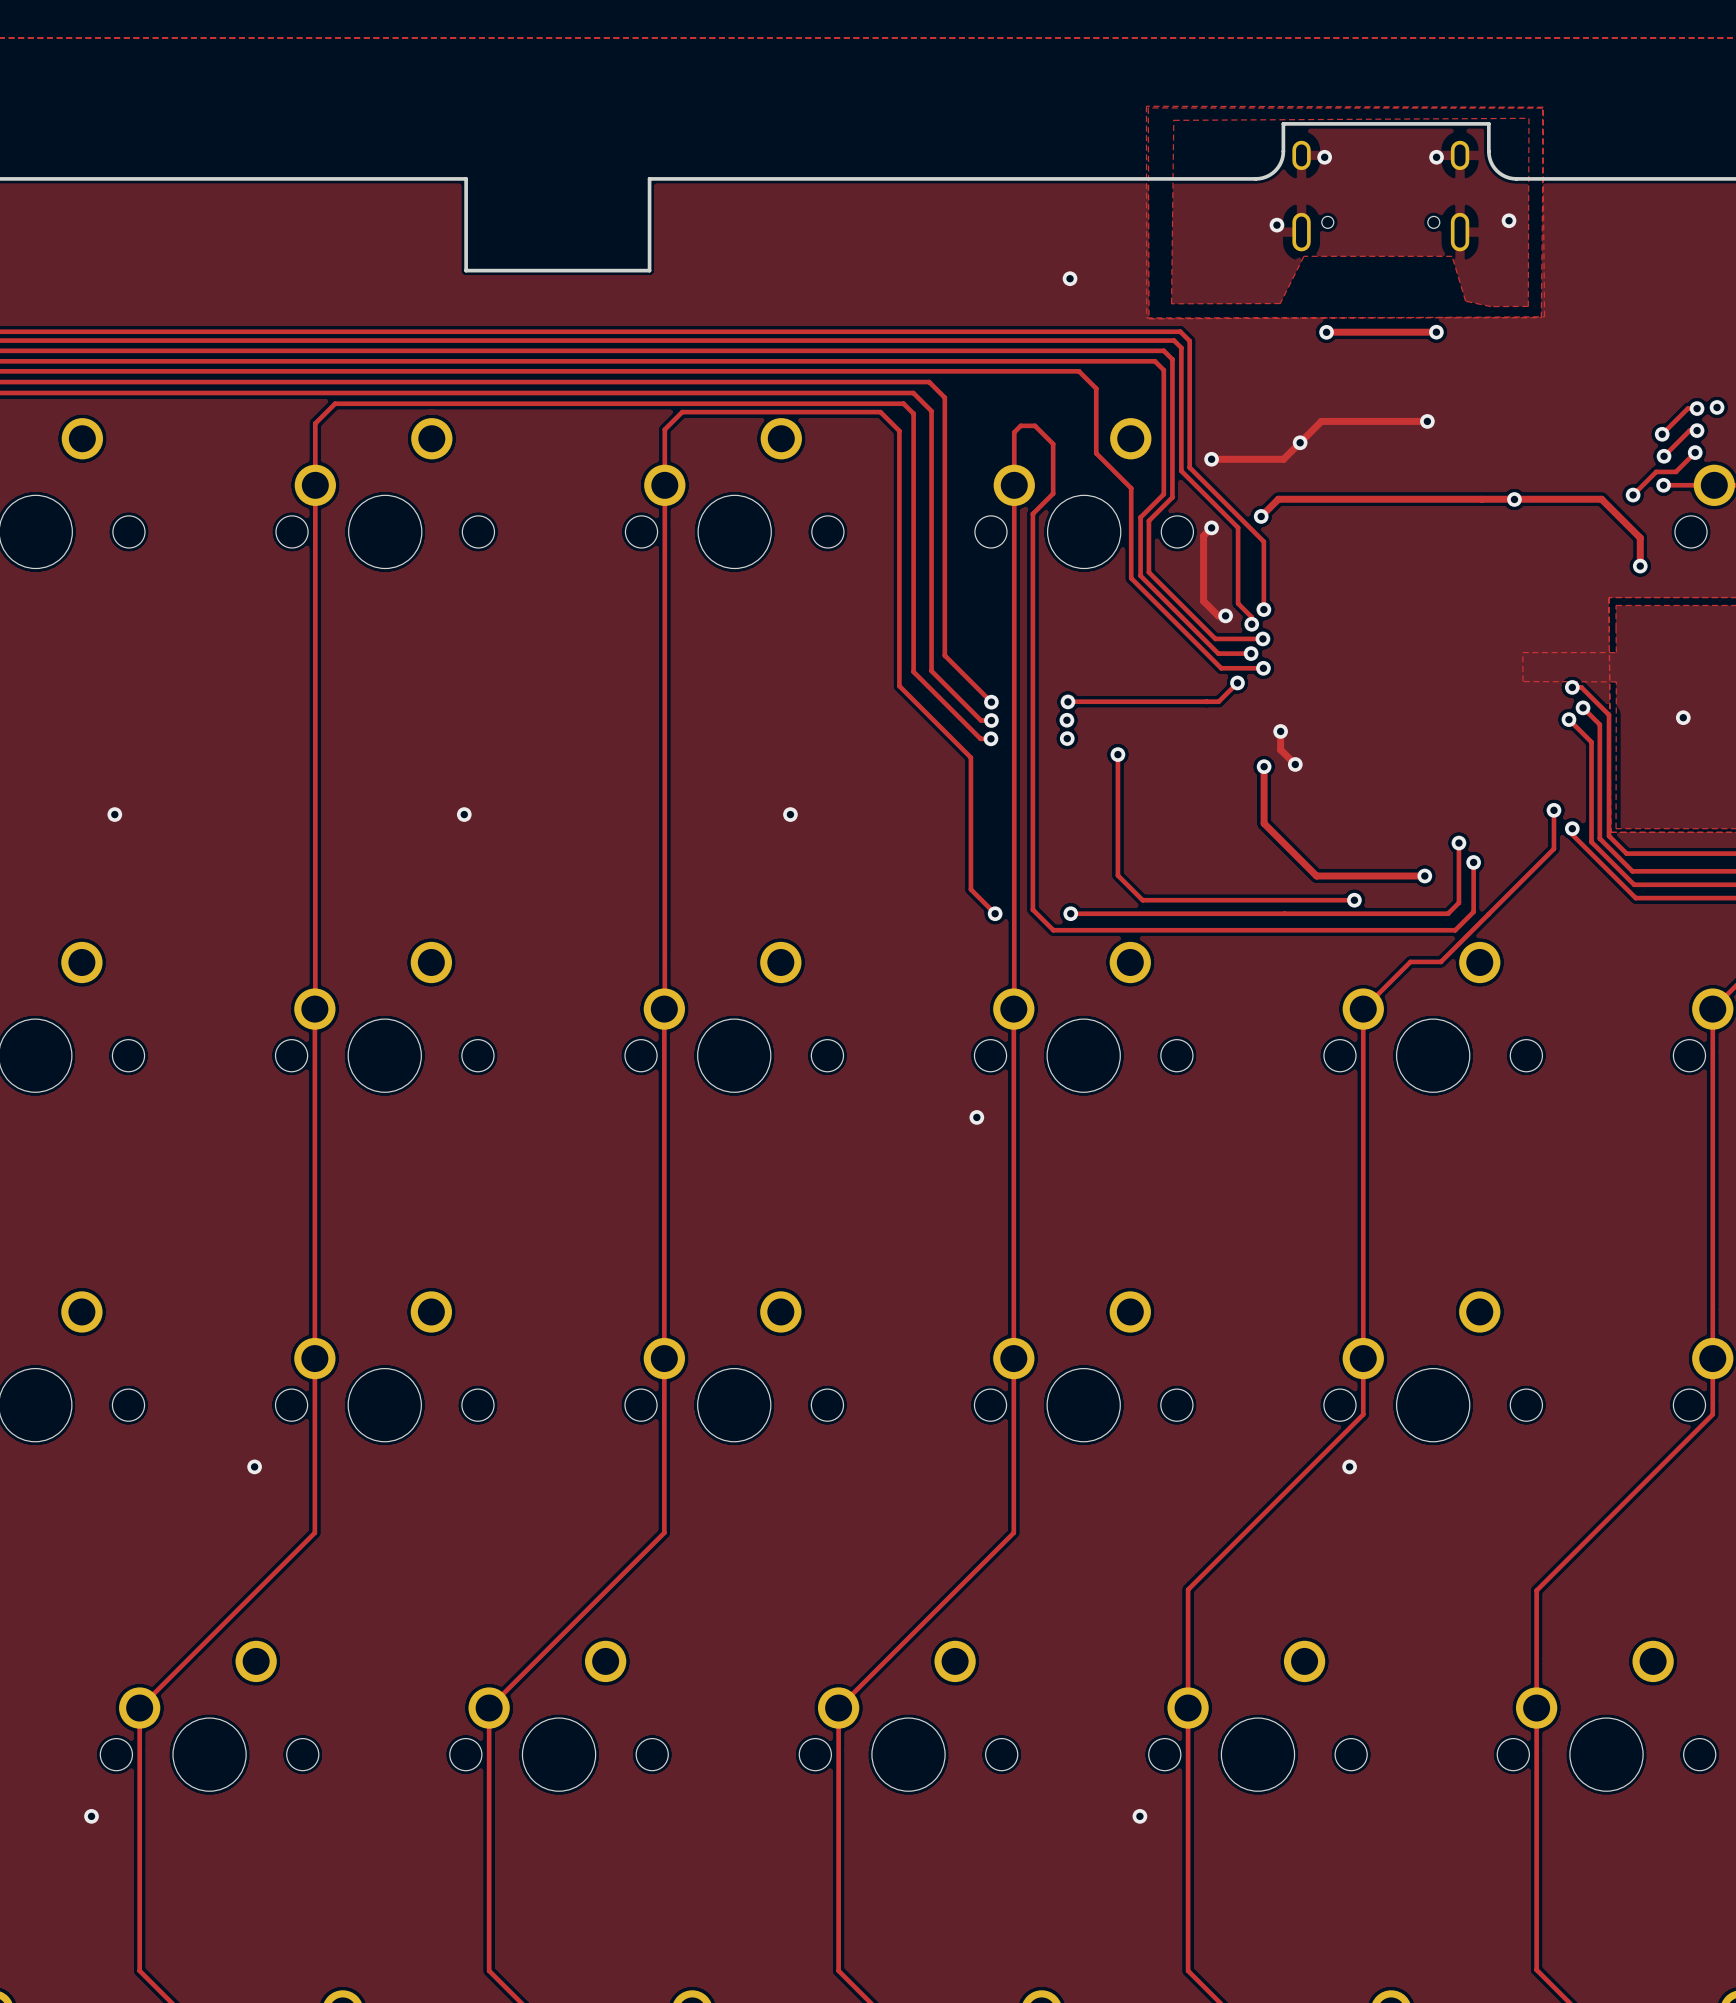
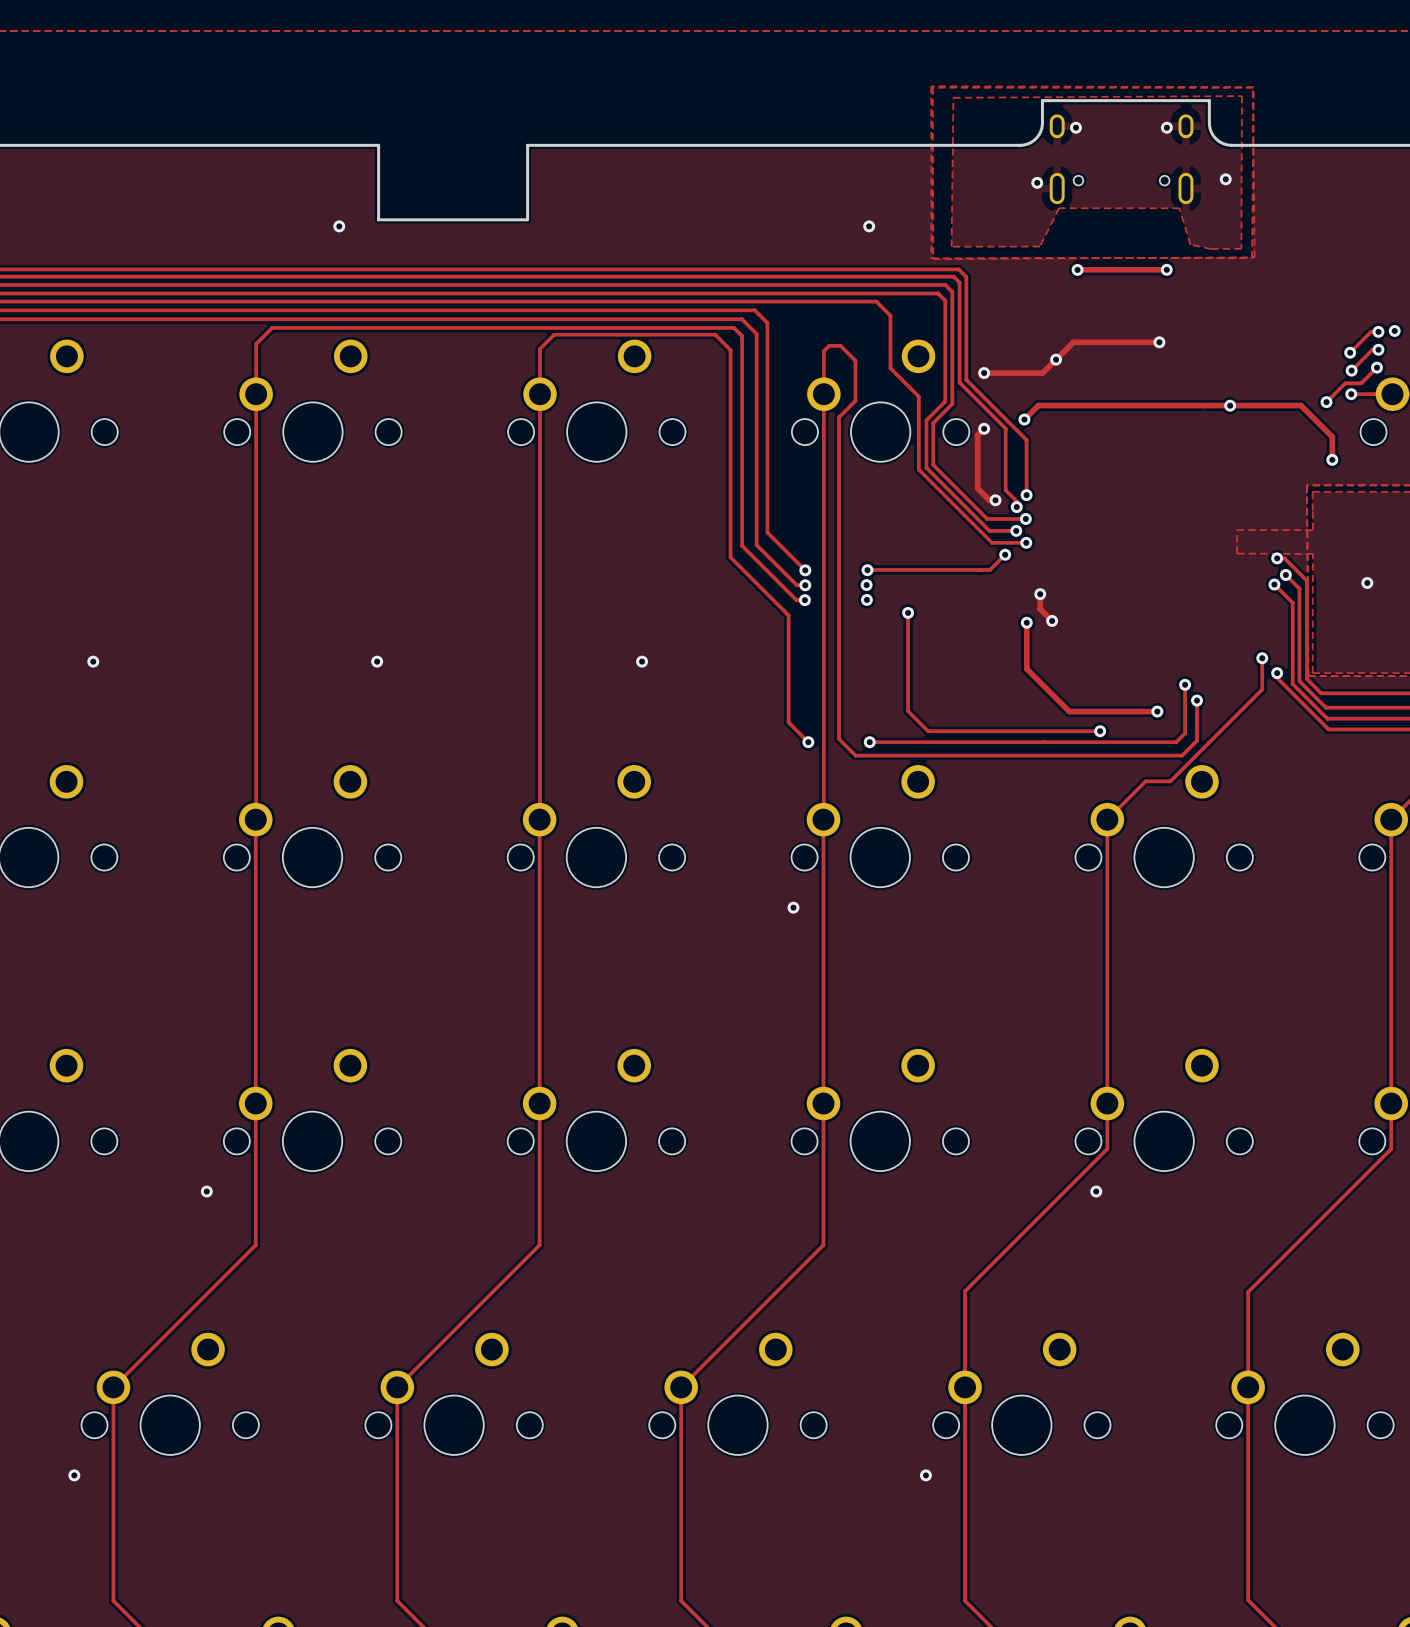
via: none -> (339, 226)

